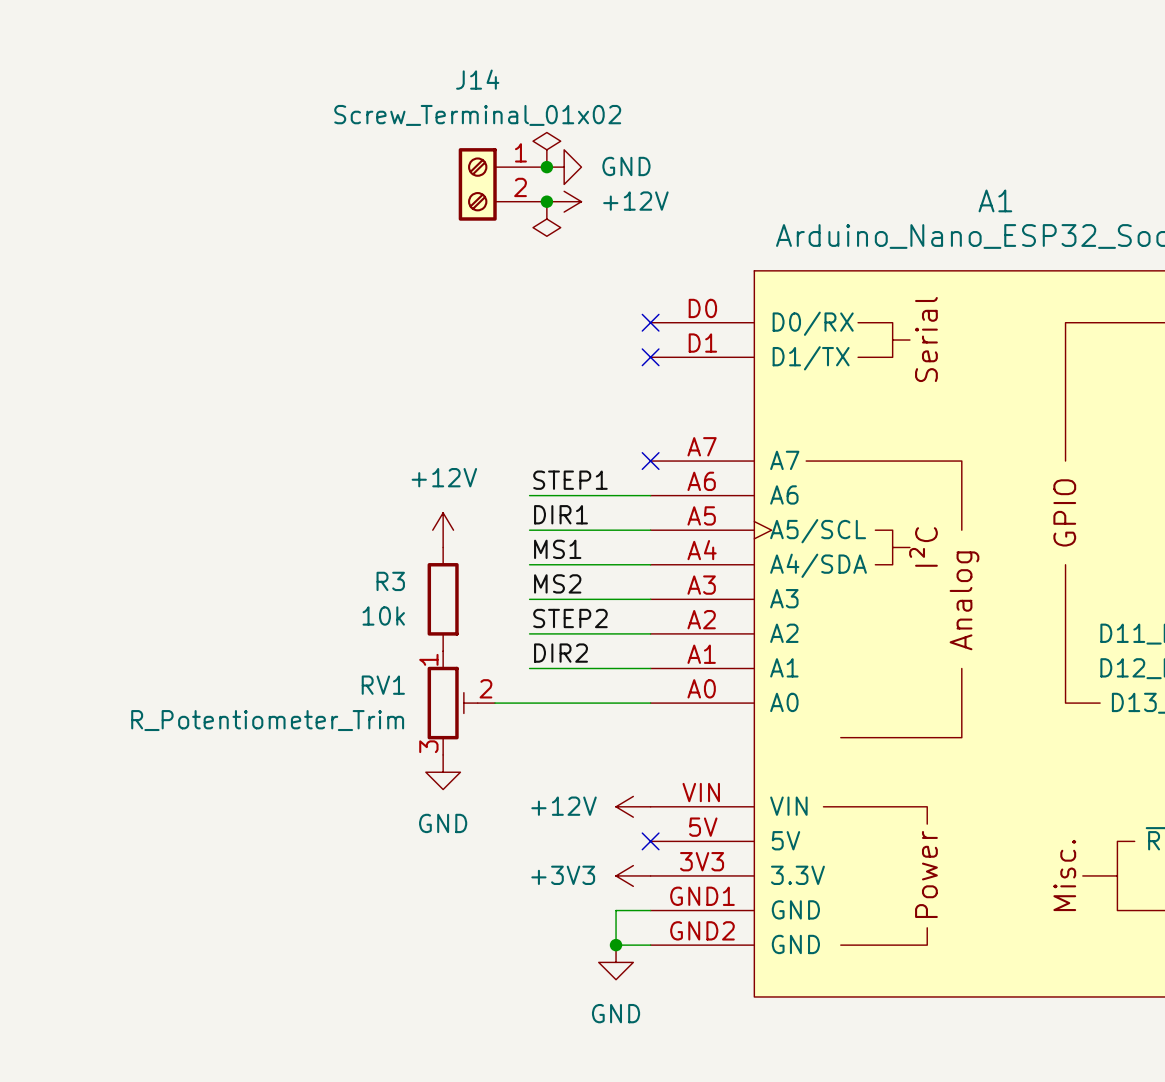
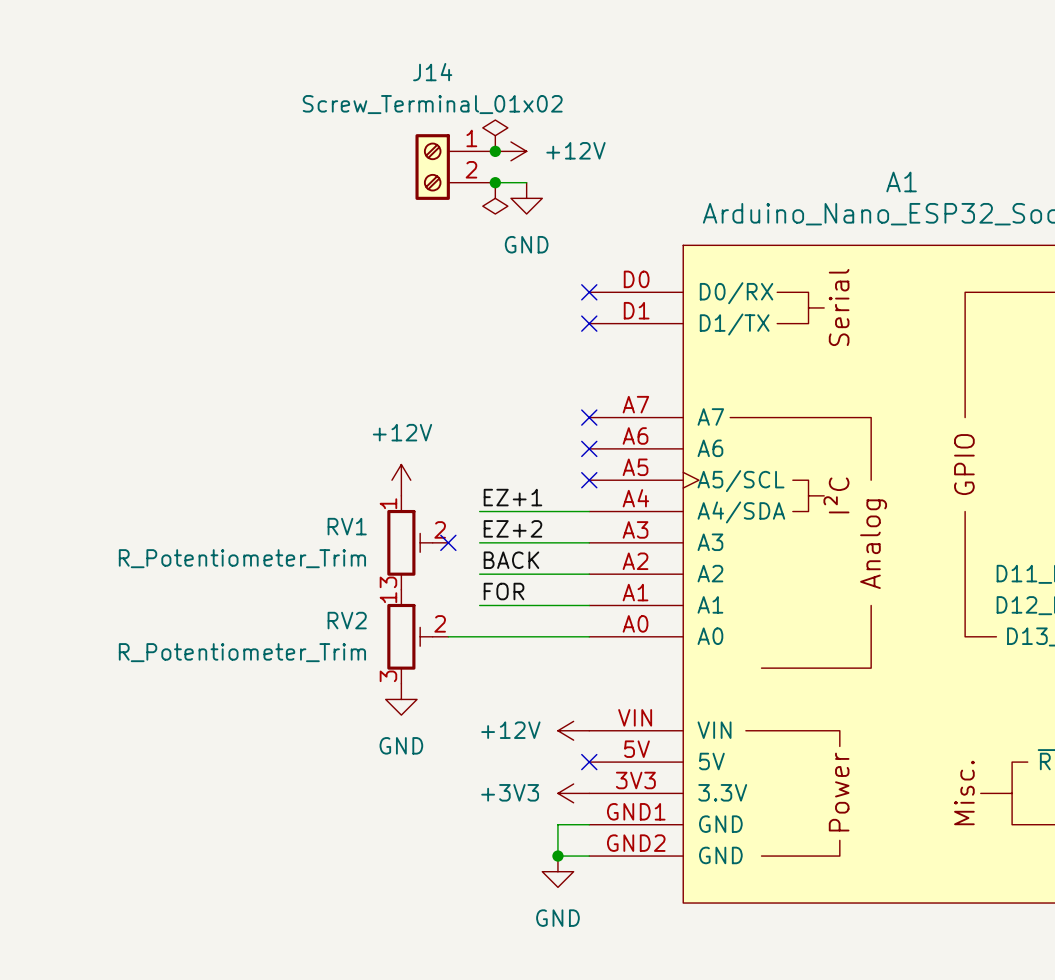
power symbol: GND (564, 167) -> +12V (510, 151)
power symbol: +12V (564, 201) -> none
power symbol: none -> GND (526, 198)
label: STEP1 (570, 480) -> none
wire: (529, 495) (650, 495) -> none
no-connect mark: none -> (589, 448)
label: DIR1 (561, 514) -> none
wire: (529, 530) (650, 530) -> none
no-connect mark: none -> (589, 480)
label: MS1 (557, 549) -> EZ+1 (512, 497)
label: MS2 (557, 583) -> EZ+2 (512, 528)
R3: 10k (443, 599) -> none
RV1: none -> R_Potentiometer_Trim (417, 542)
no-connect mark: none -> (448, 542)
label: STEP2 (570, 618) -> BACK (511, 560)
label: DIR2 (561, 653) -> FOR (504, 591)
RV1 name: RV1 (383, 685) -> RV2 (347, 620)

